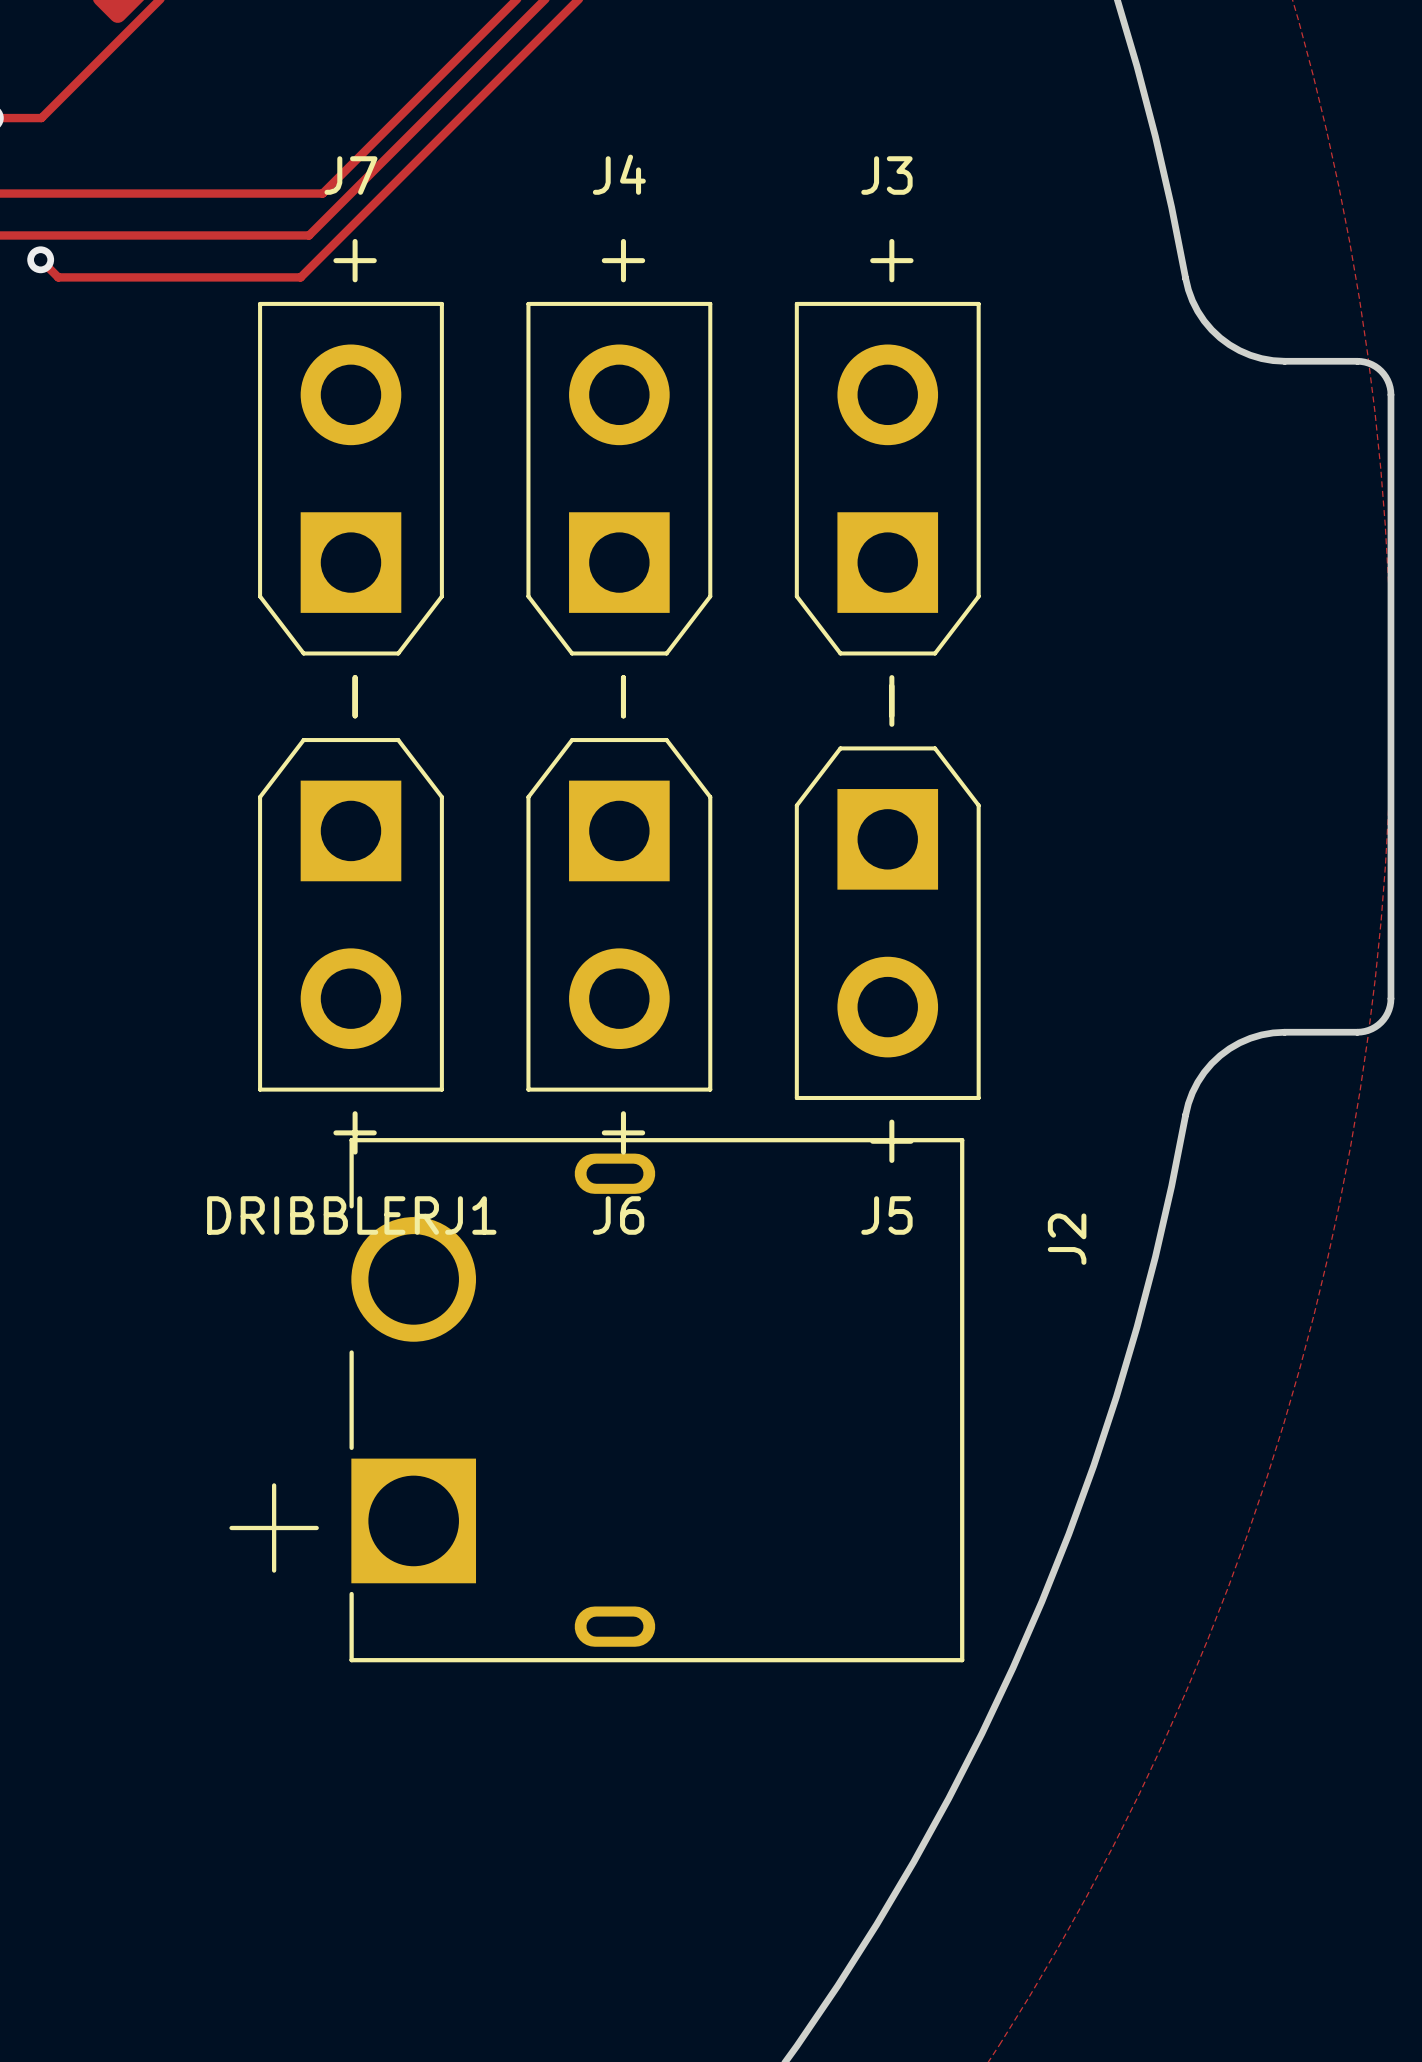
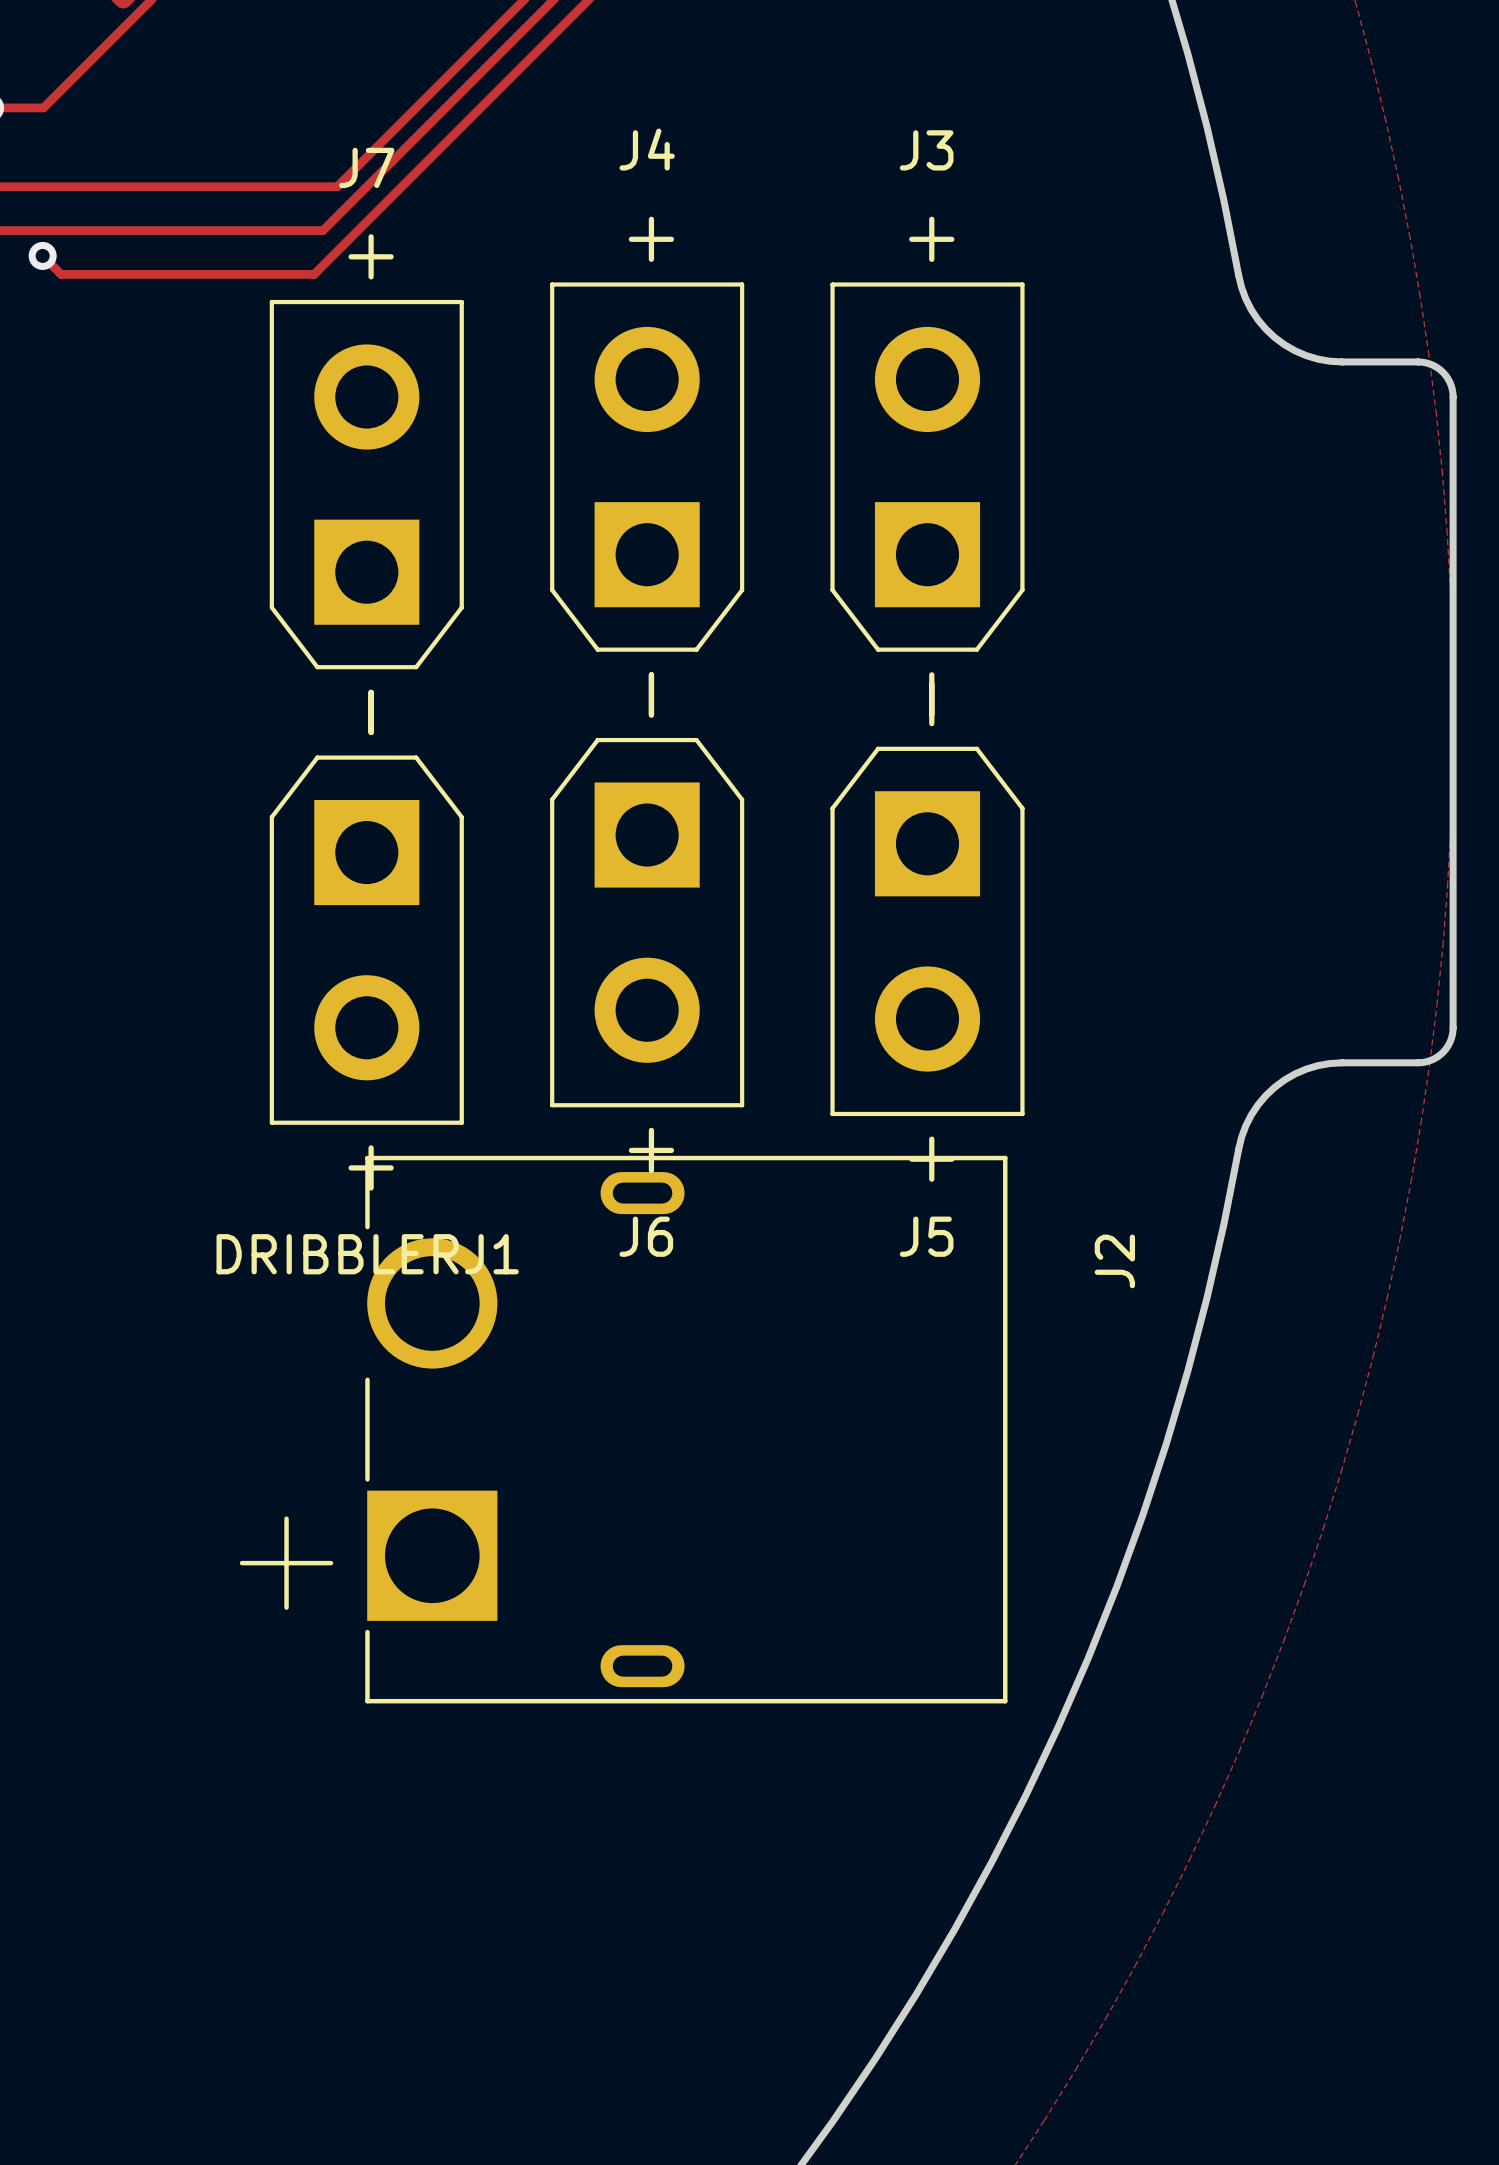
J4 position: (619, 478) -> (647, 467)
J3 position: (887, 478) -> (927, 467)
J6 position: (619, 914) -> (647, 922)
J5 position: (887, 923) -> (927, 931)
J2 position: (596, 1400) -> (623, 1429)

